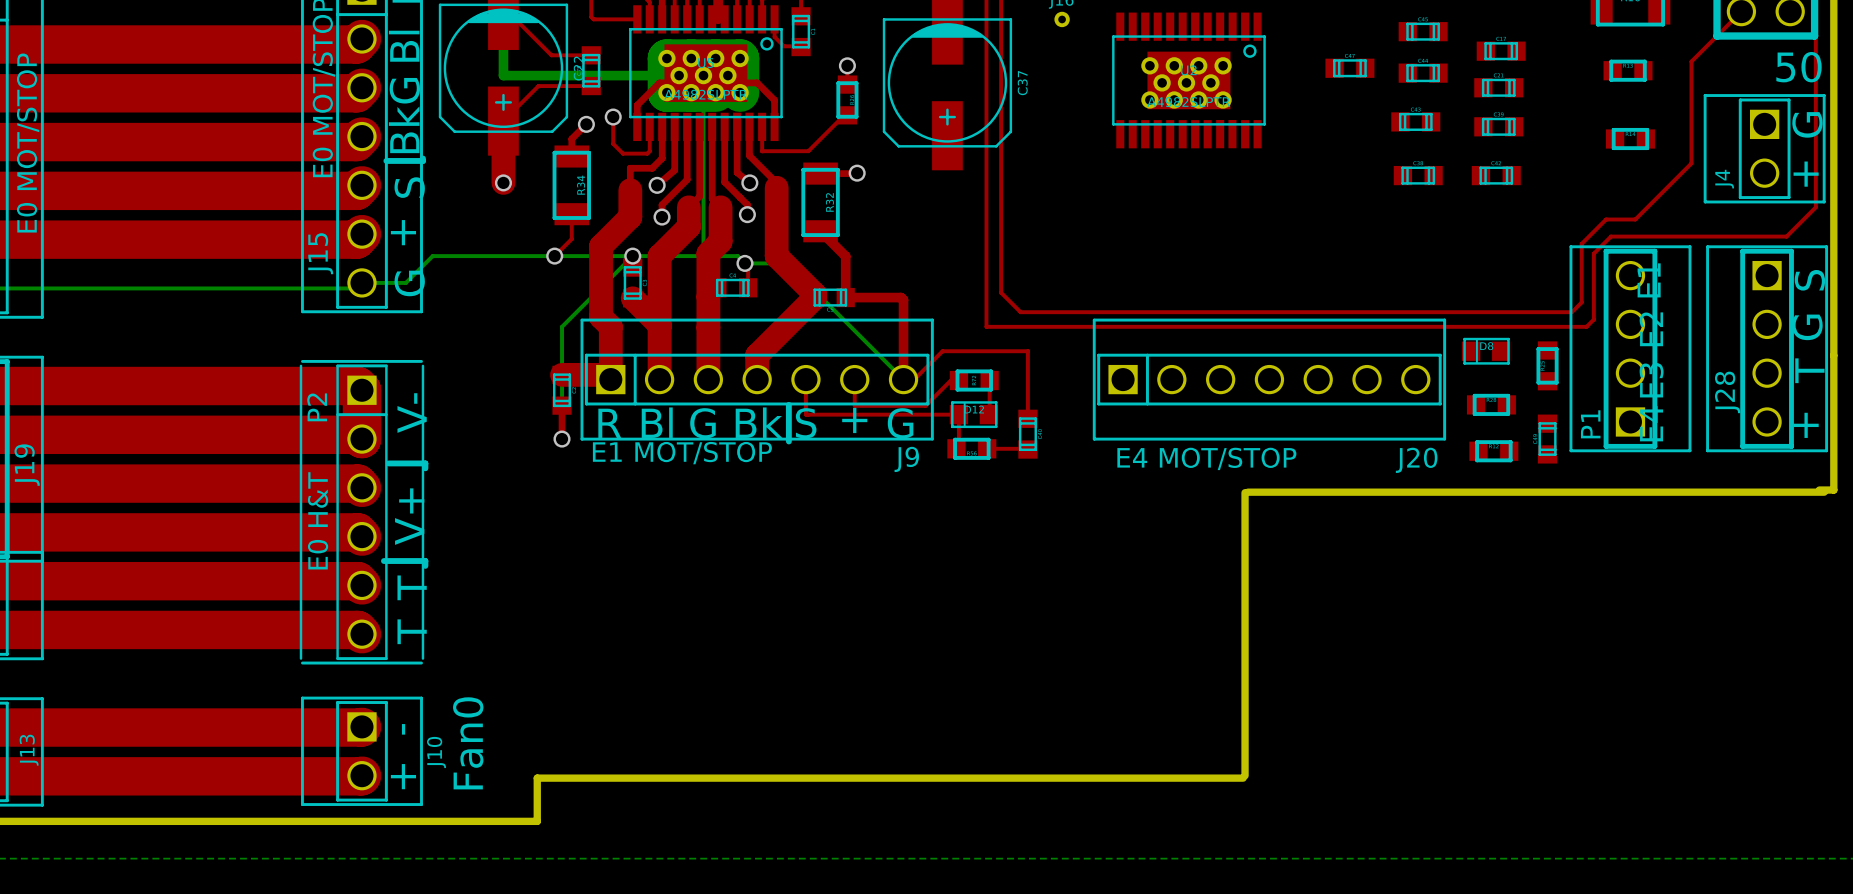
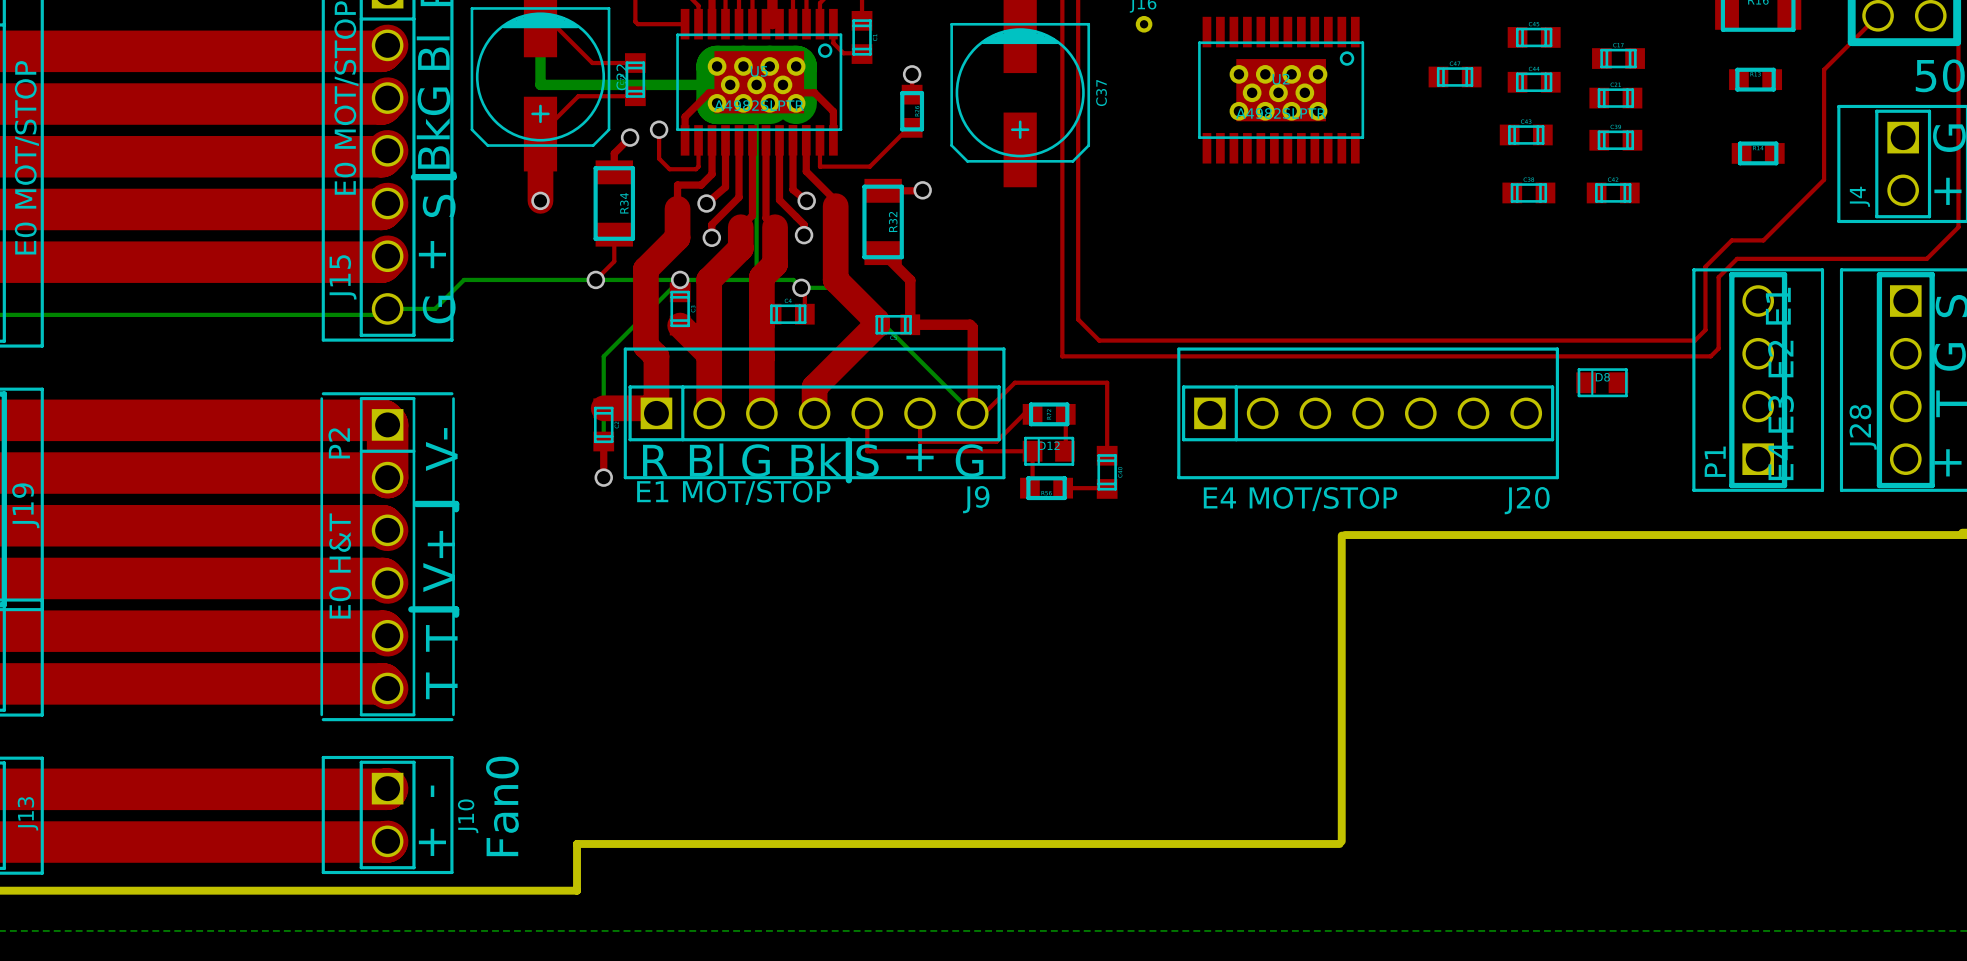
part: (1547, 365) -> none
part: (1491, 404) -> none
part: (1547, 439) -> none
part: (1493, 451) -> none

